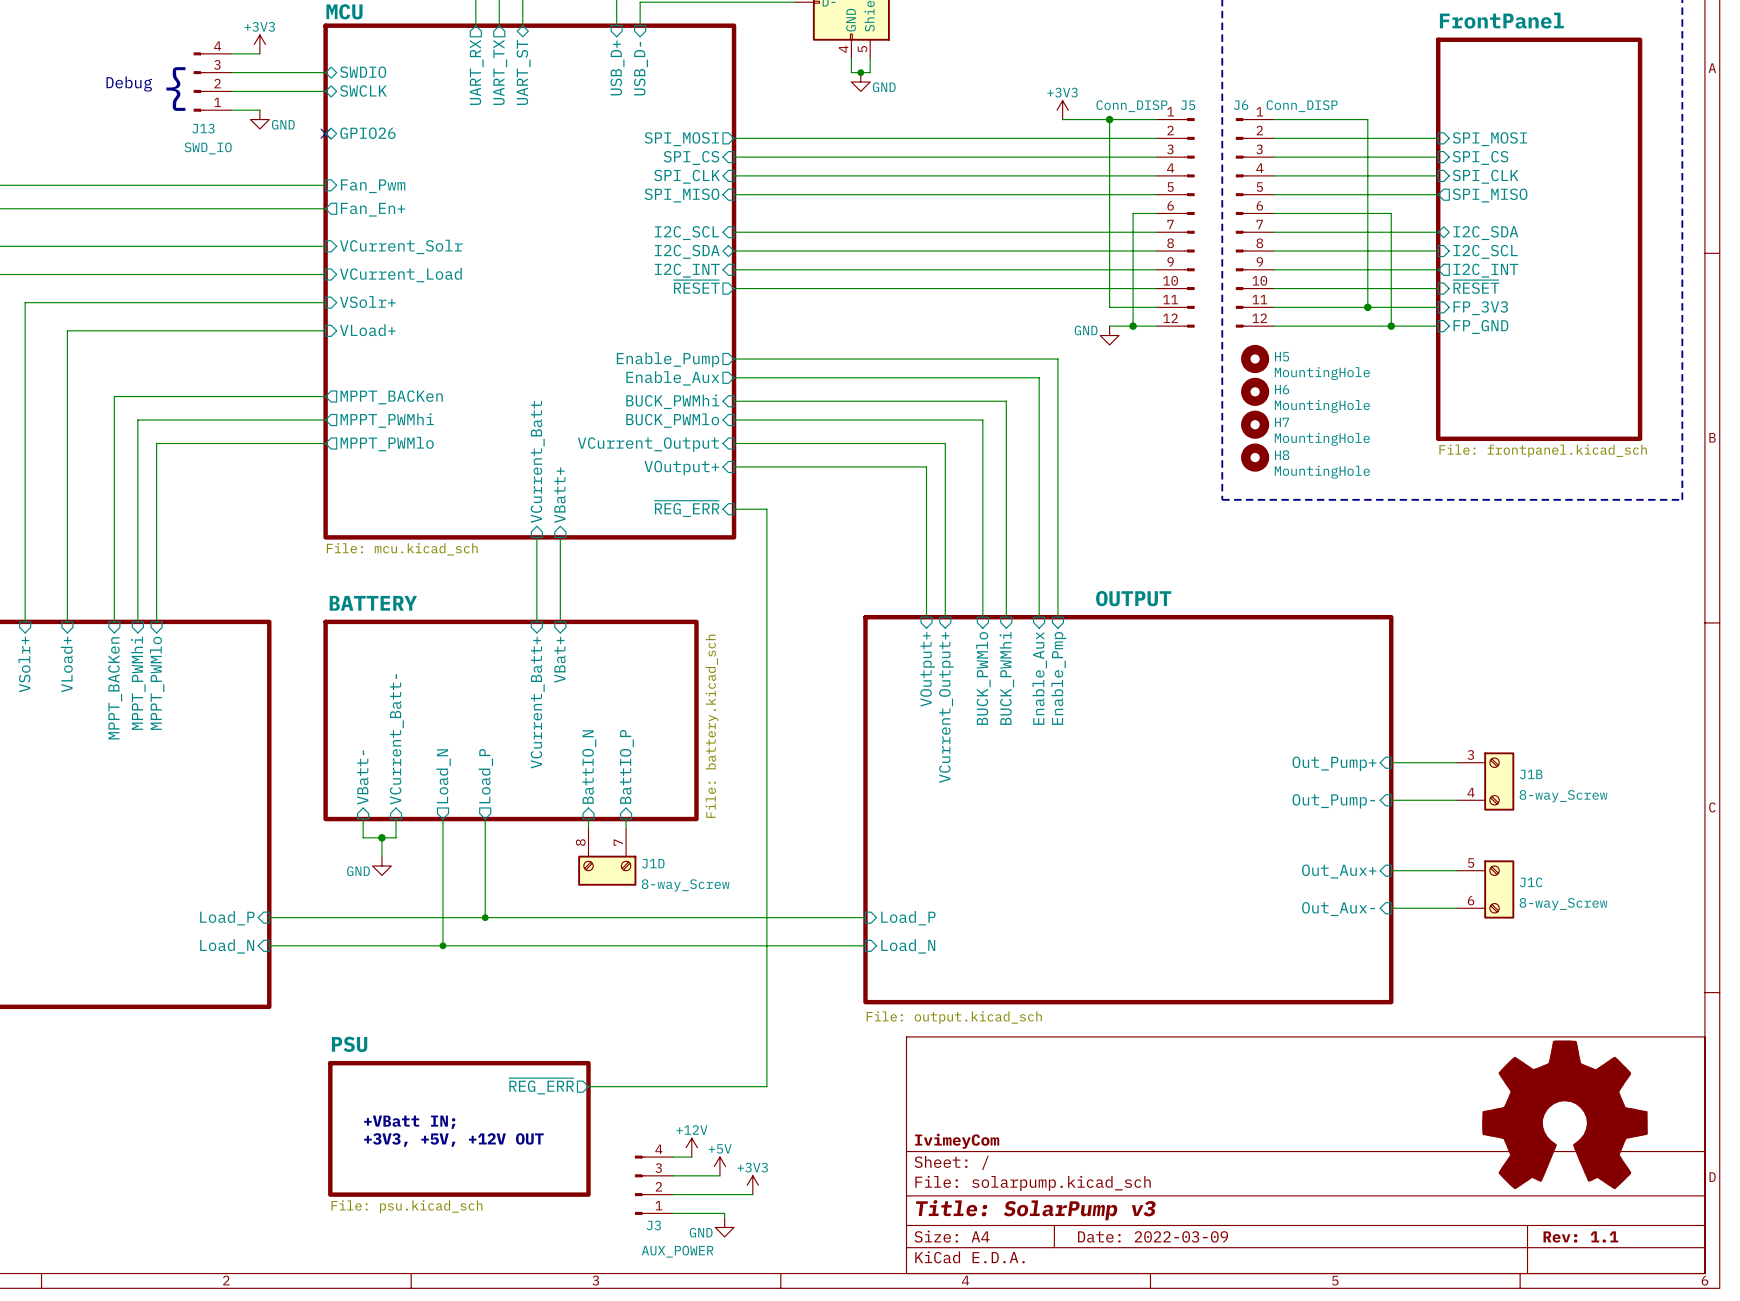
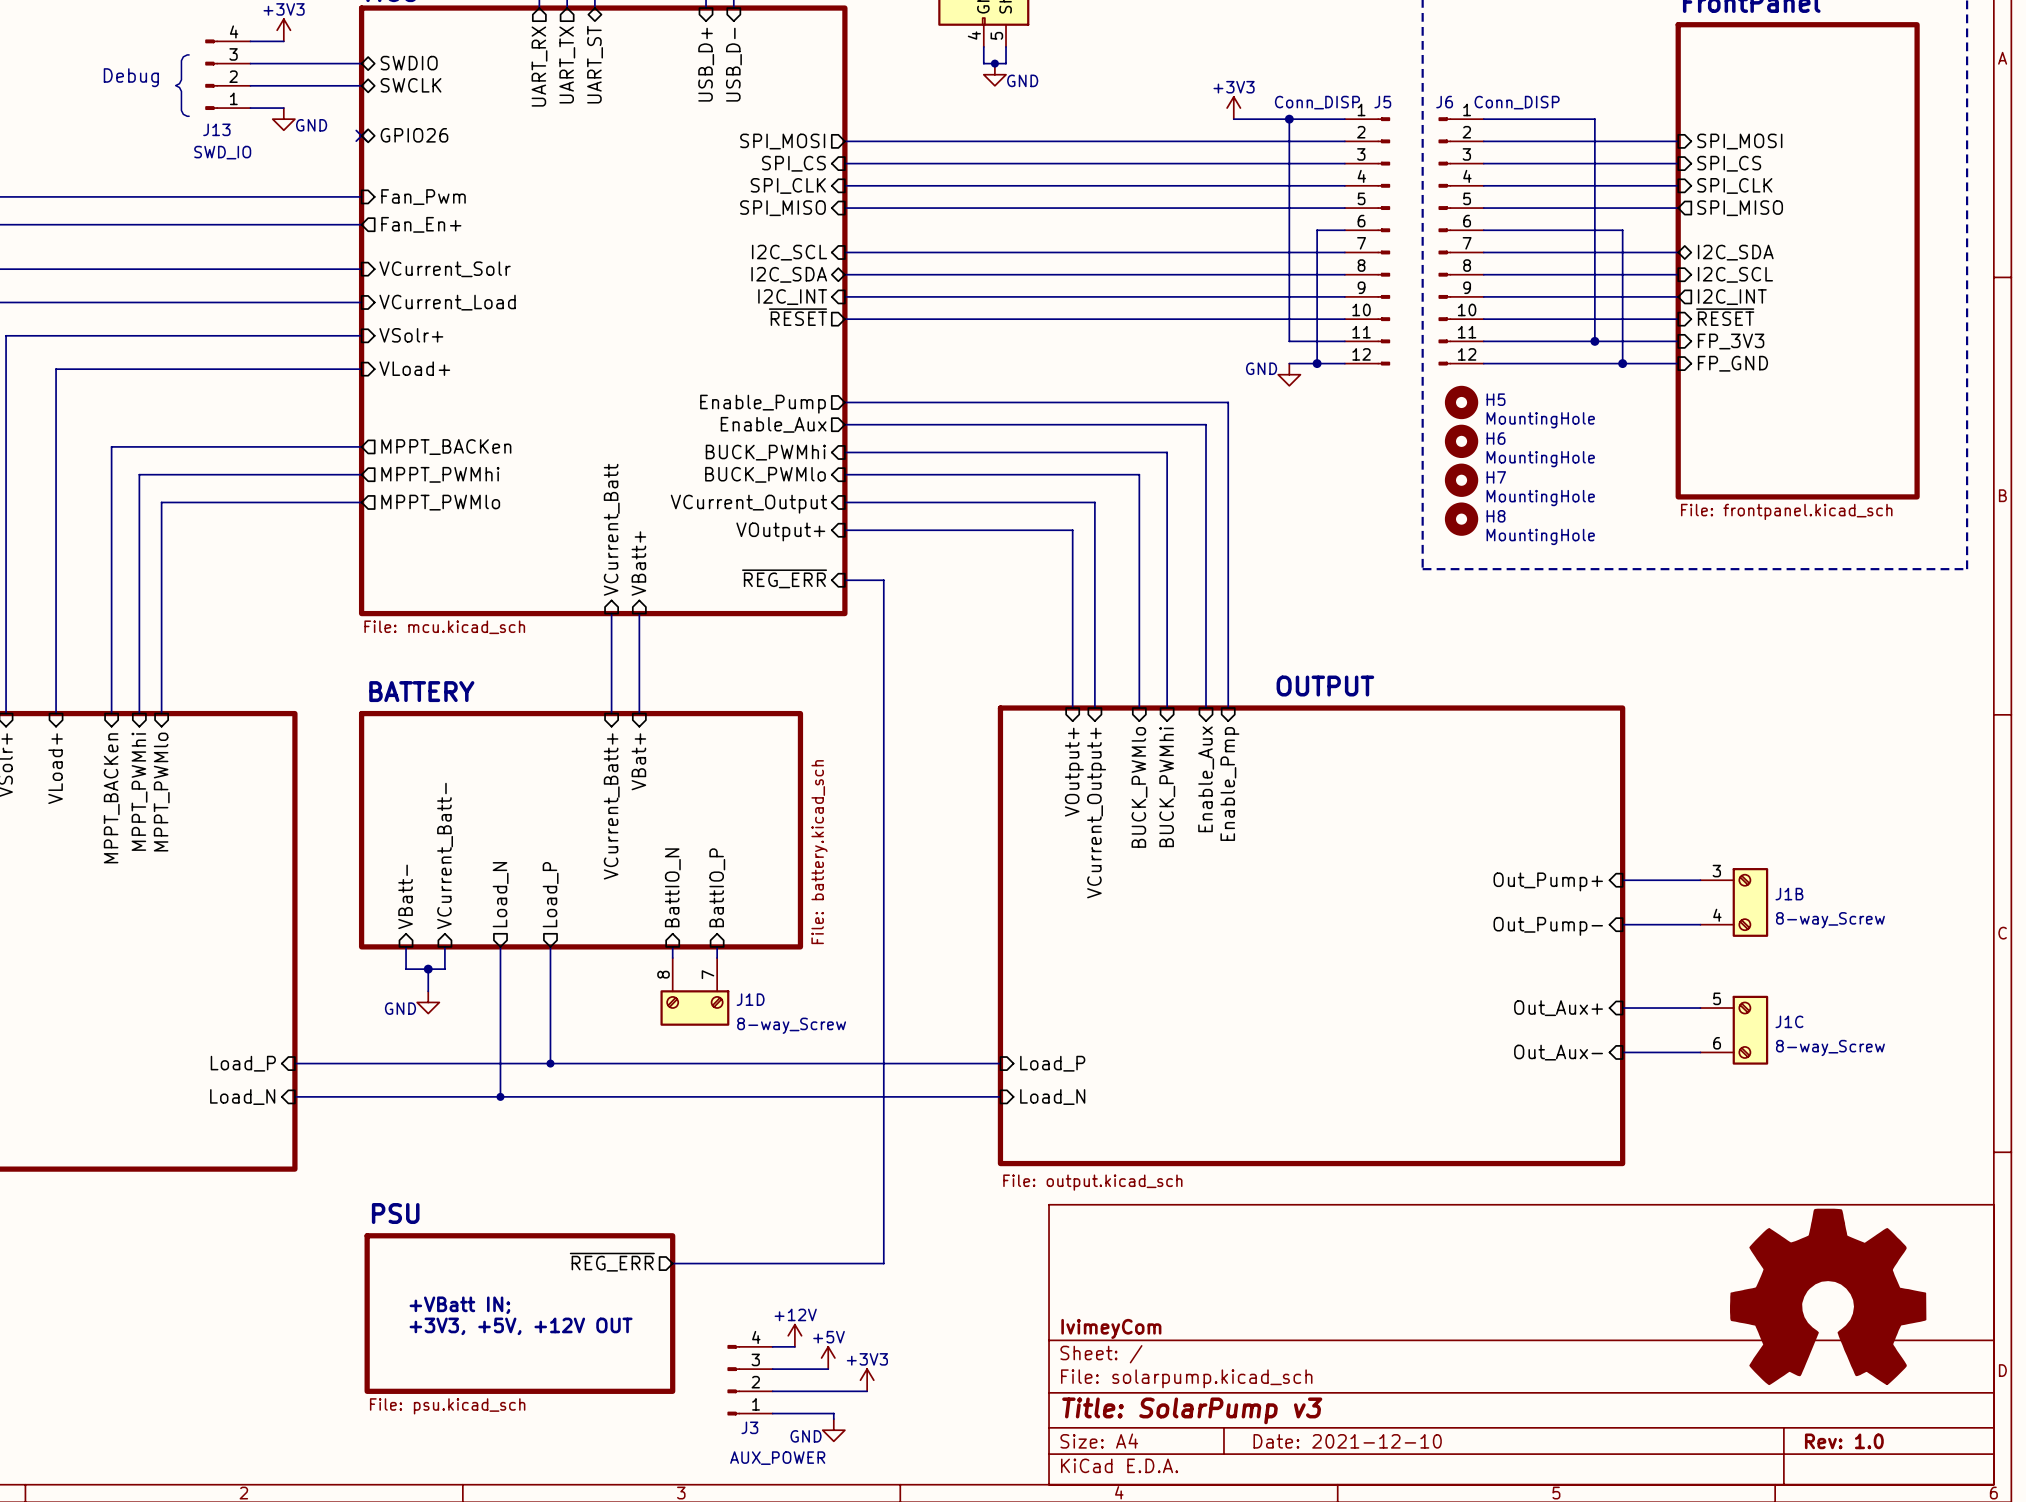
title block: Date: 2022-03-09 (1153, 1236) -> Date: 2021-12-10 (1347, 1441)
title block: Rev: 1.1 (1580, 1236) -> Rev: 1.0 (1844, 1441)

